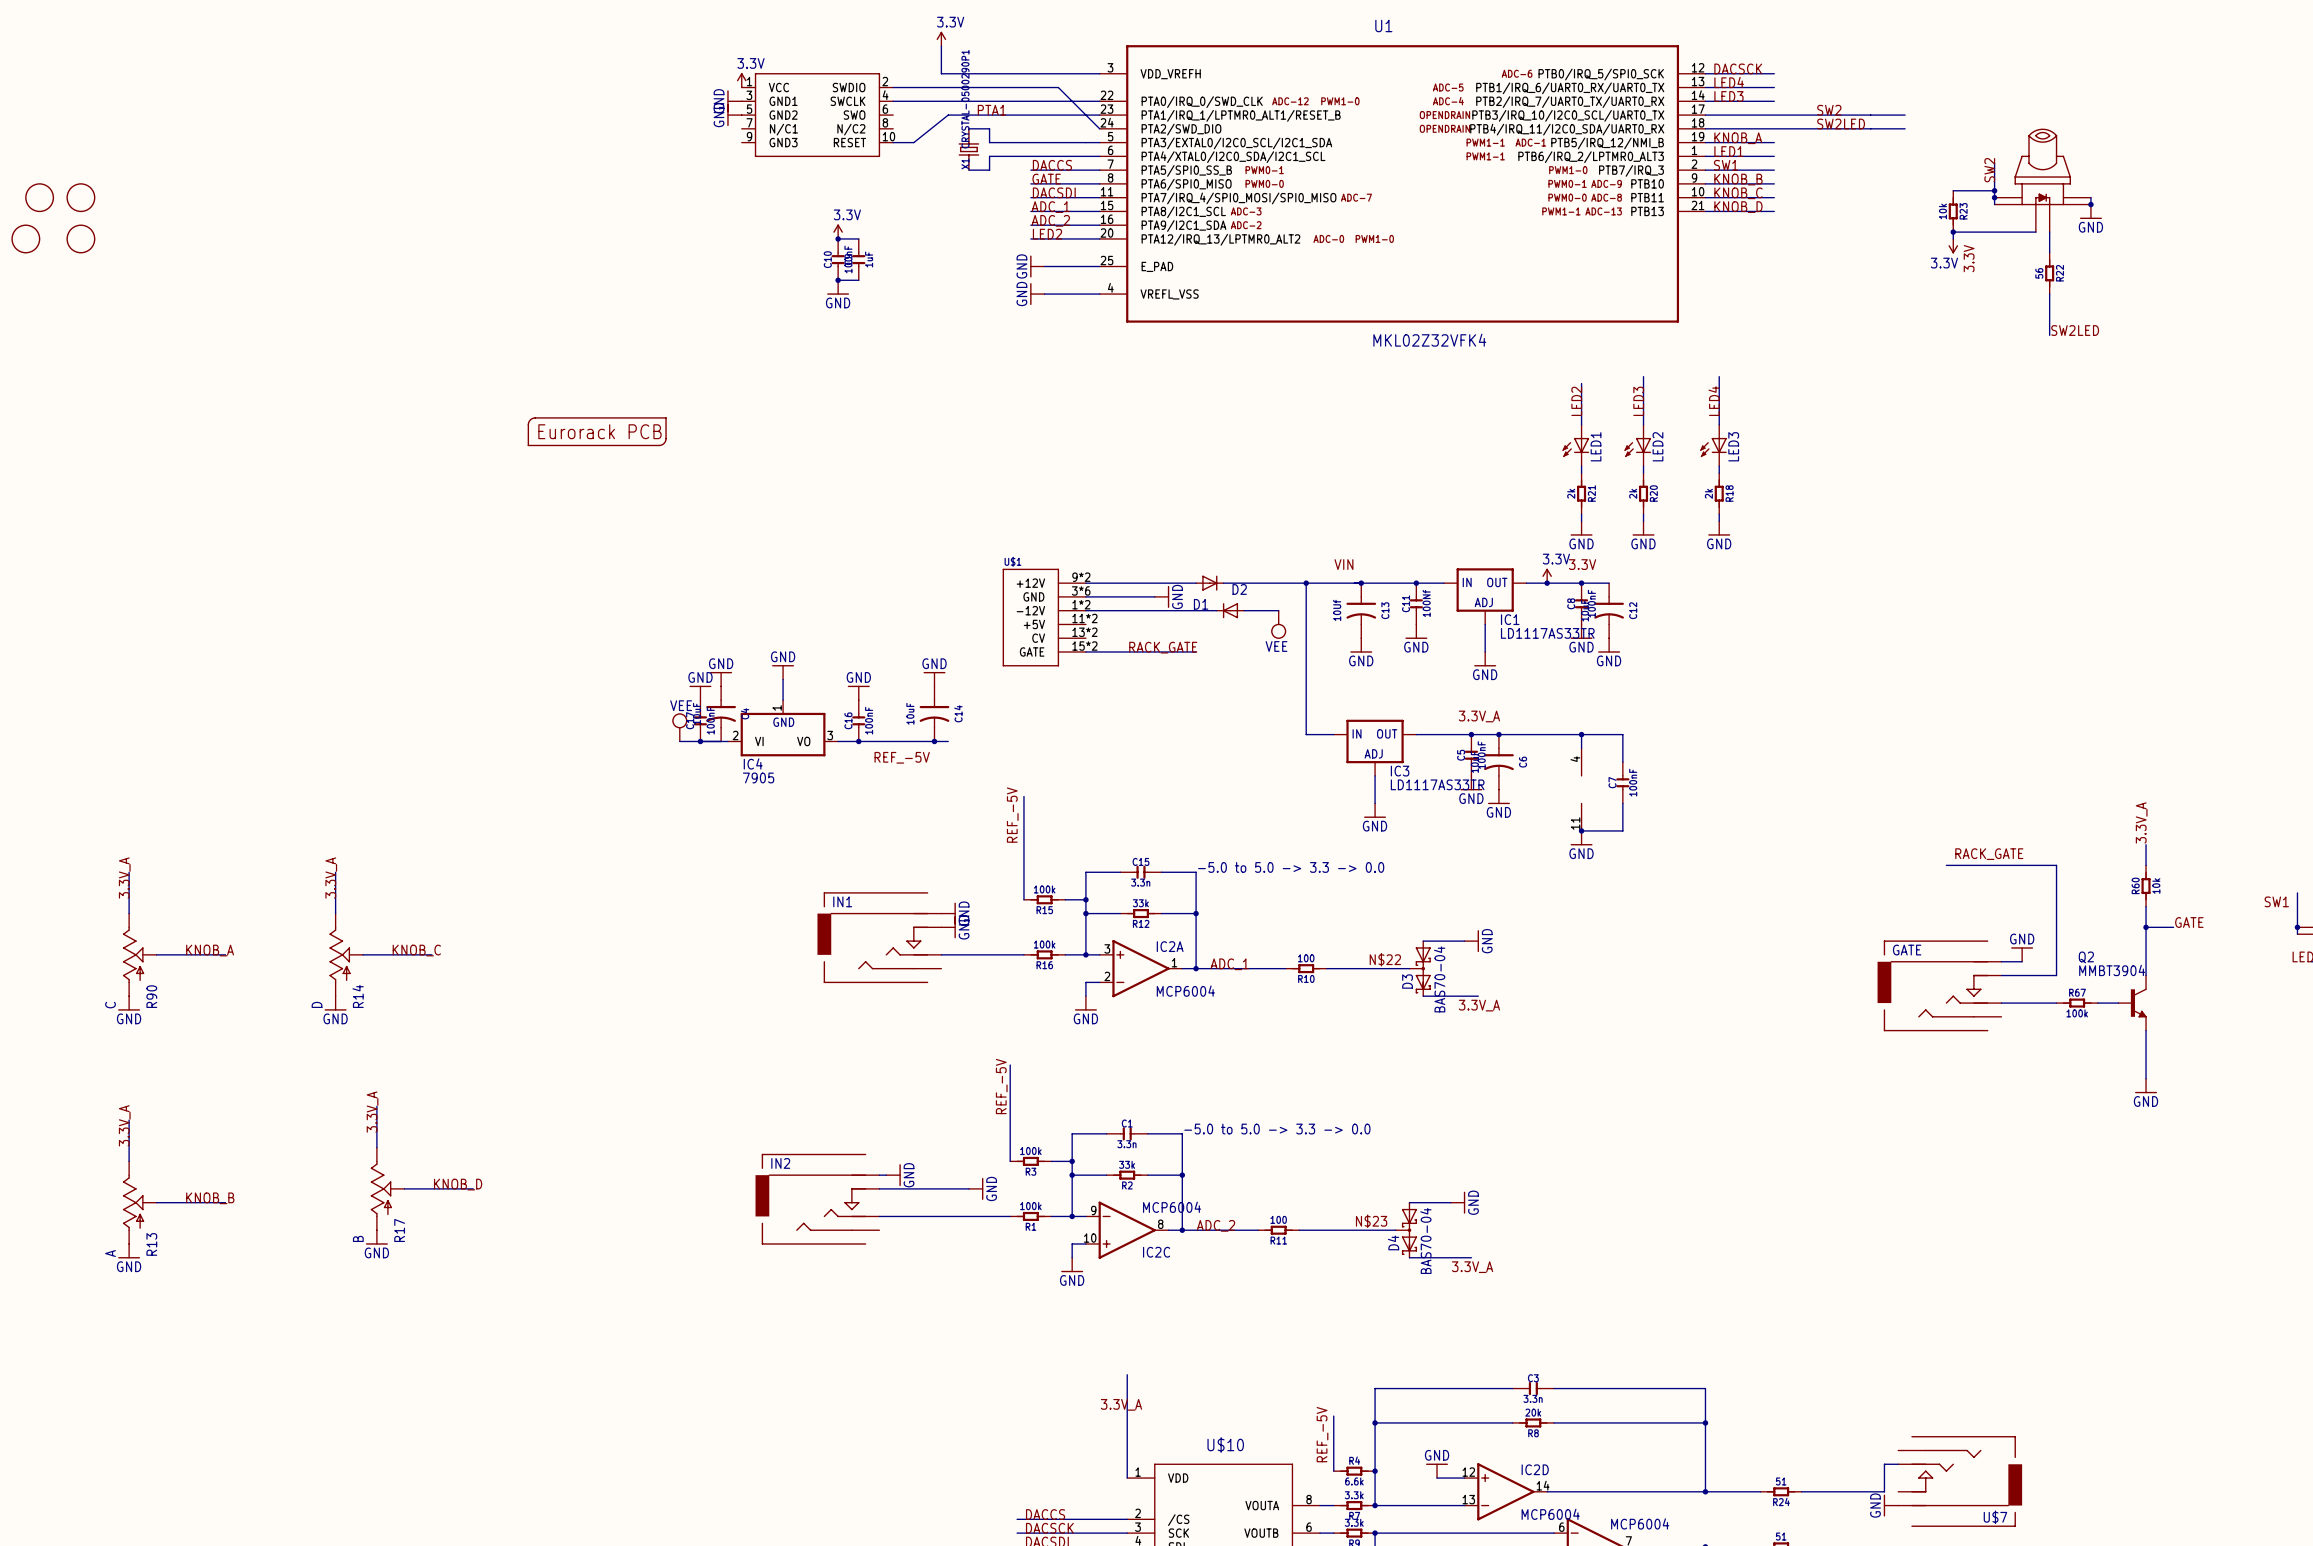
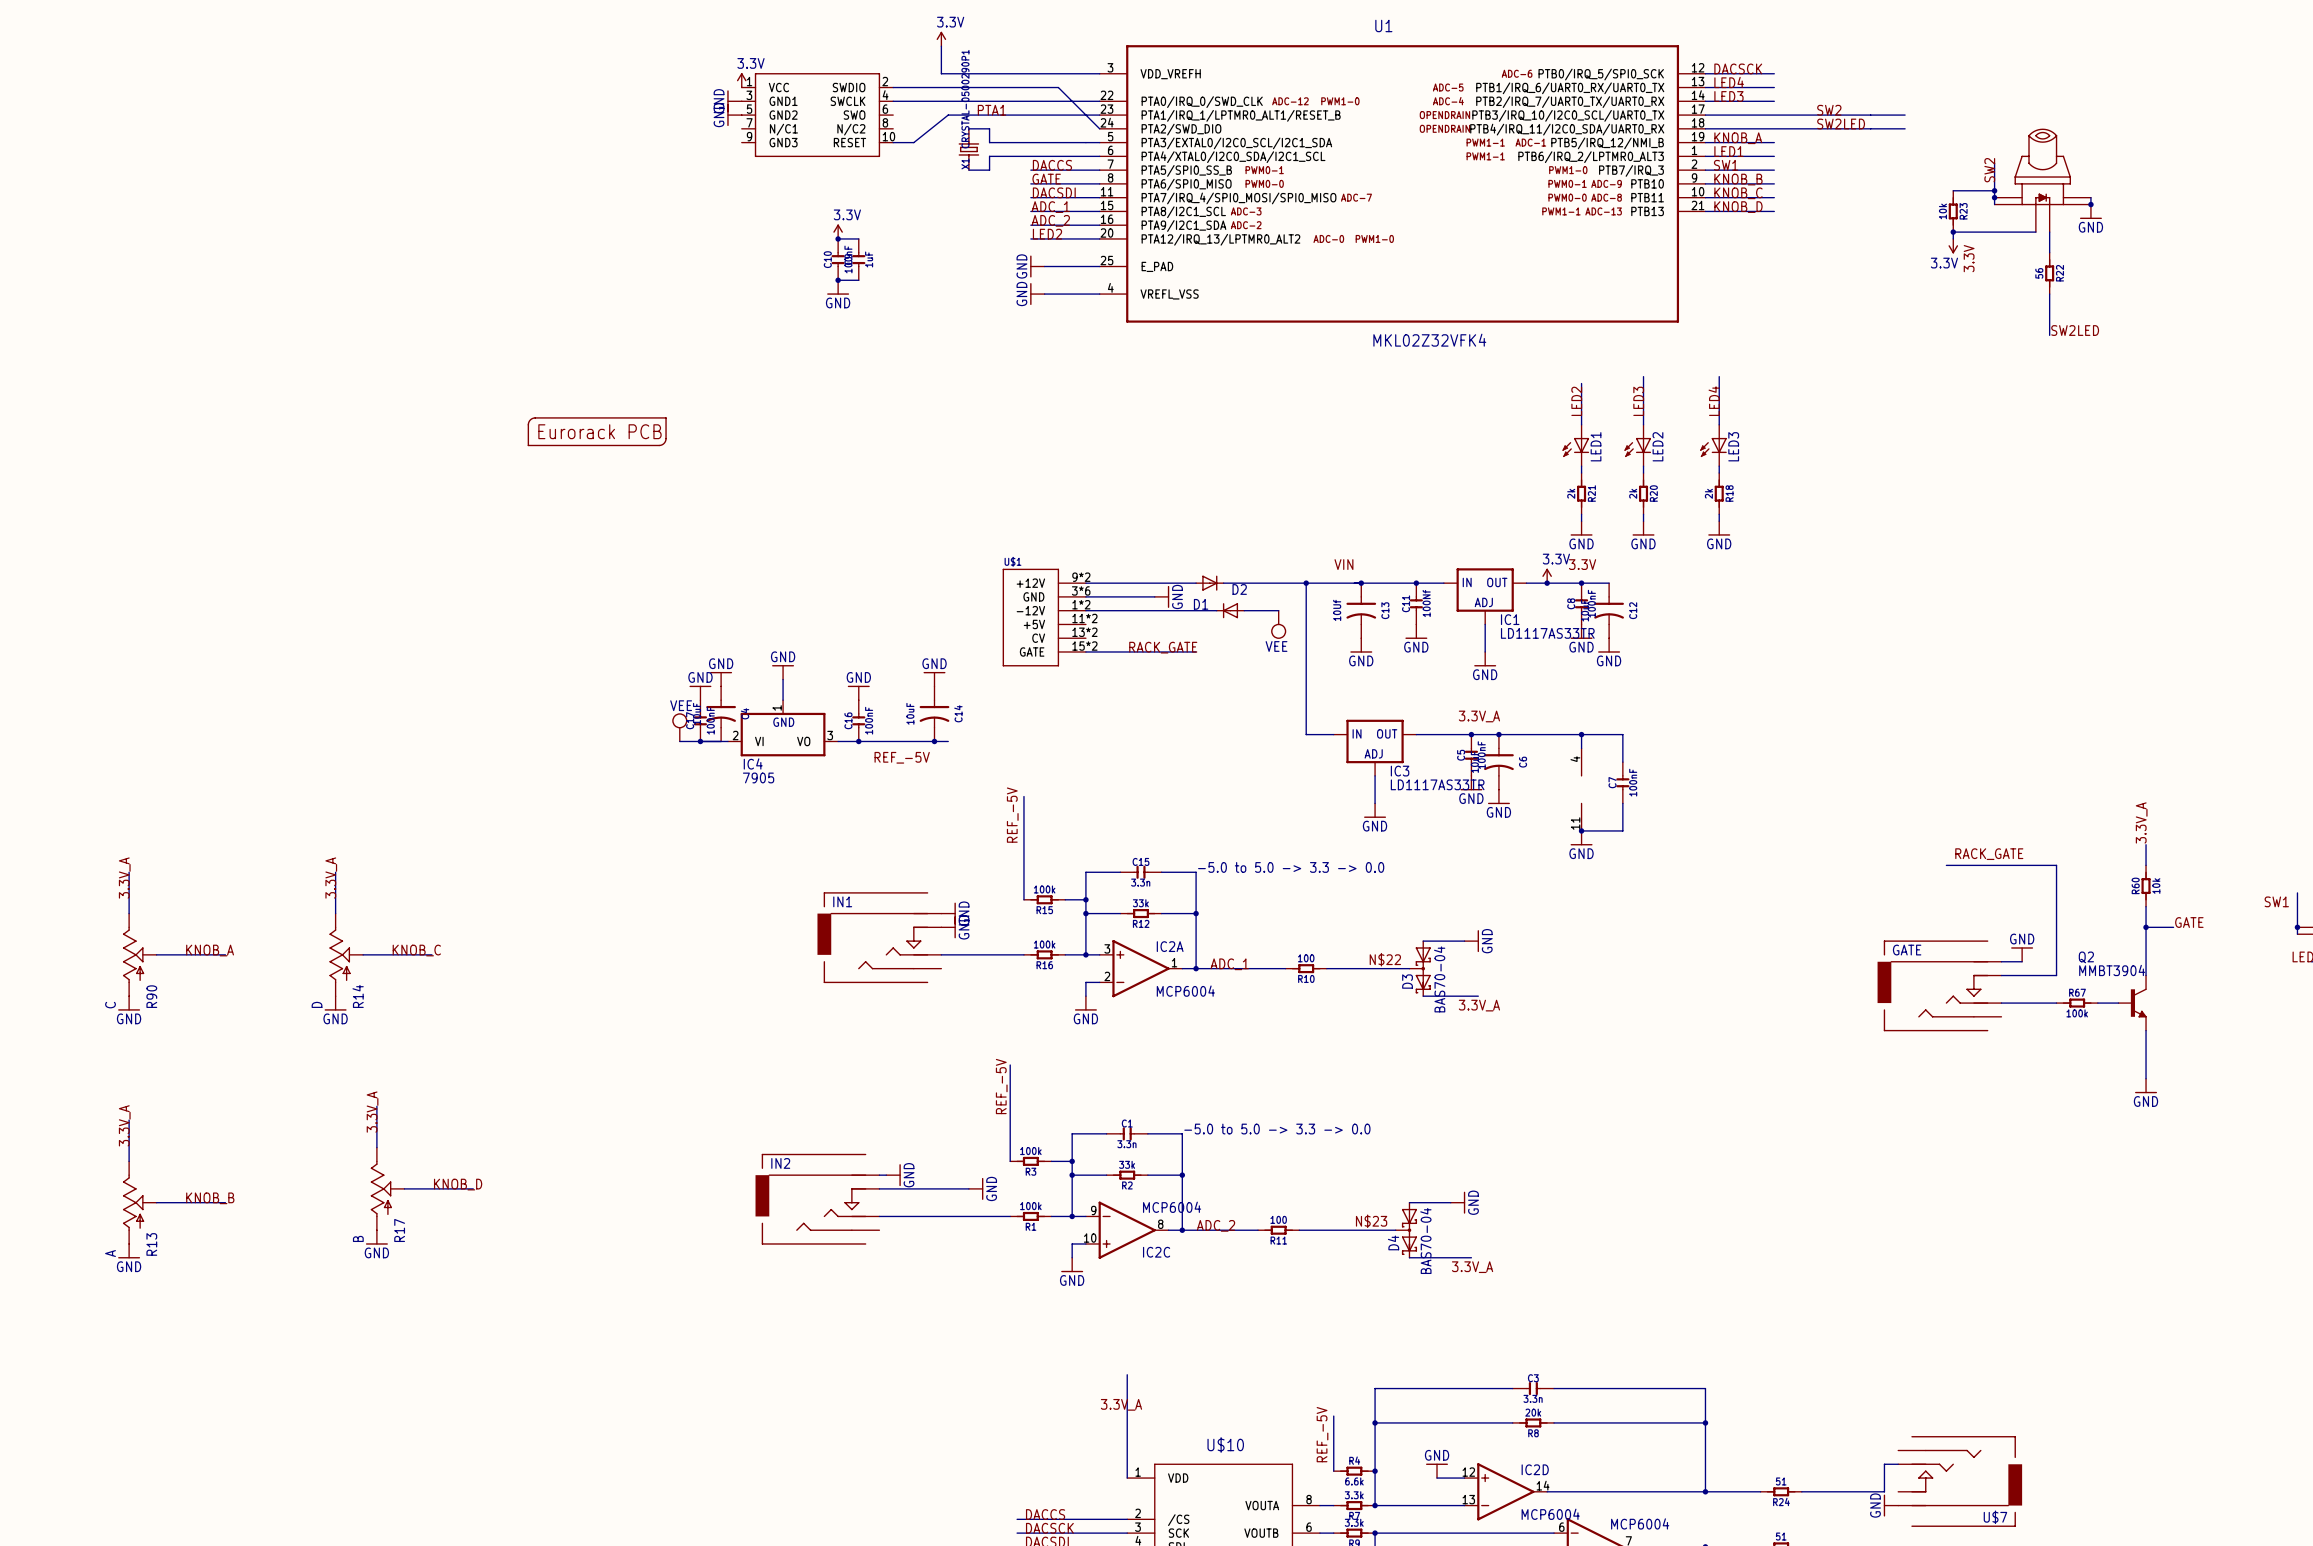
part: (39, 197) -> none
part: (80, 197) -> none
part: (25, 238) -> none
part: (80, 238) -> none

